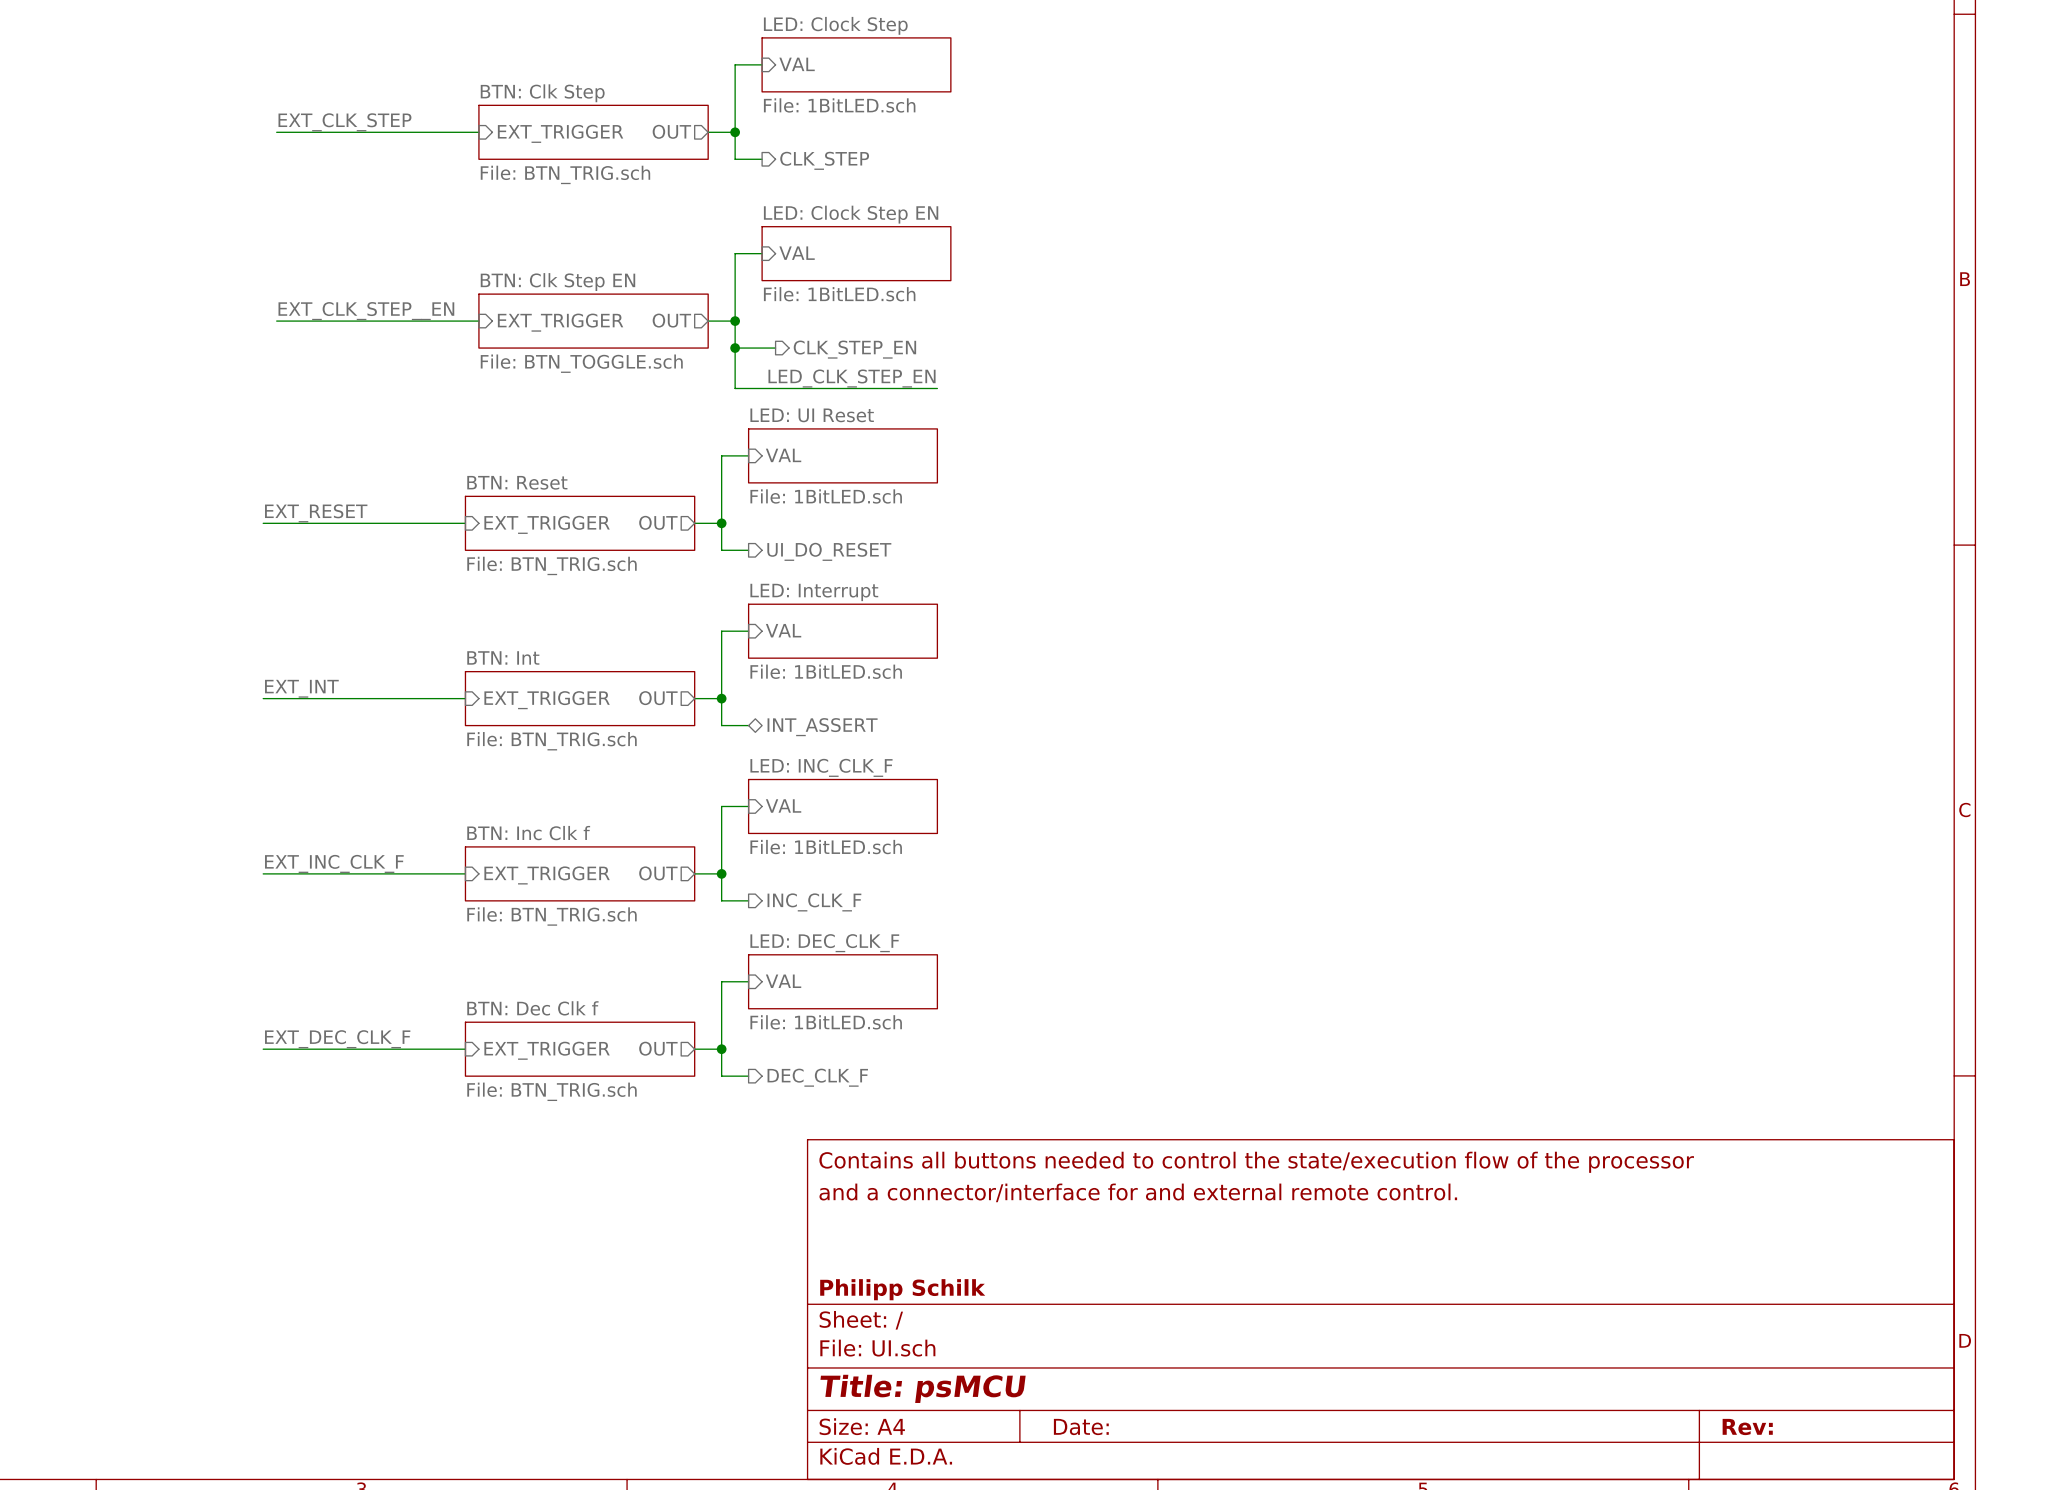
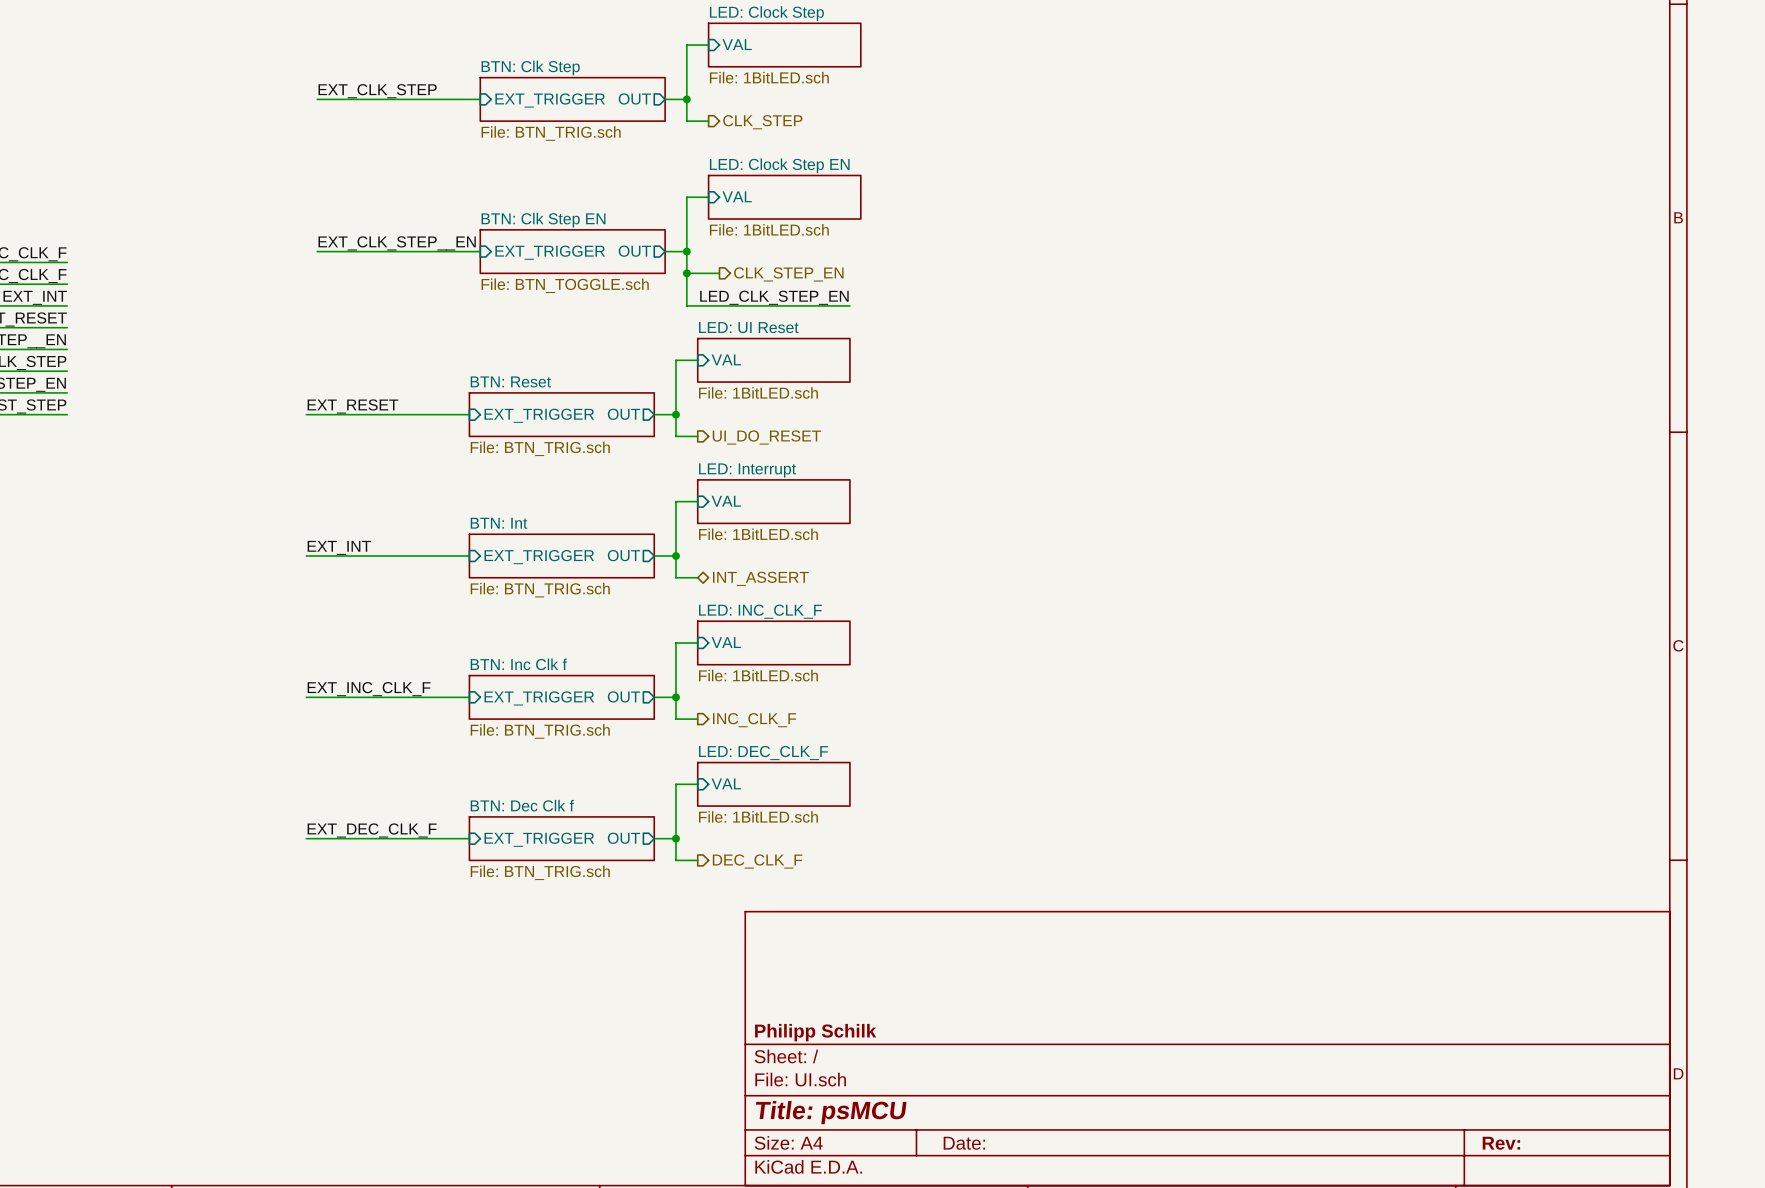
title block: Contains all buttons needed to control the state/execution flow of the processor (1256, 1162) -> none
title block: and a connector/interface for and external remote control. (1138, 1192) -> none

